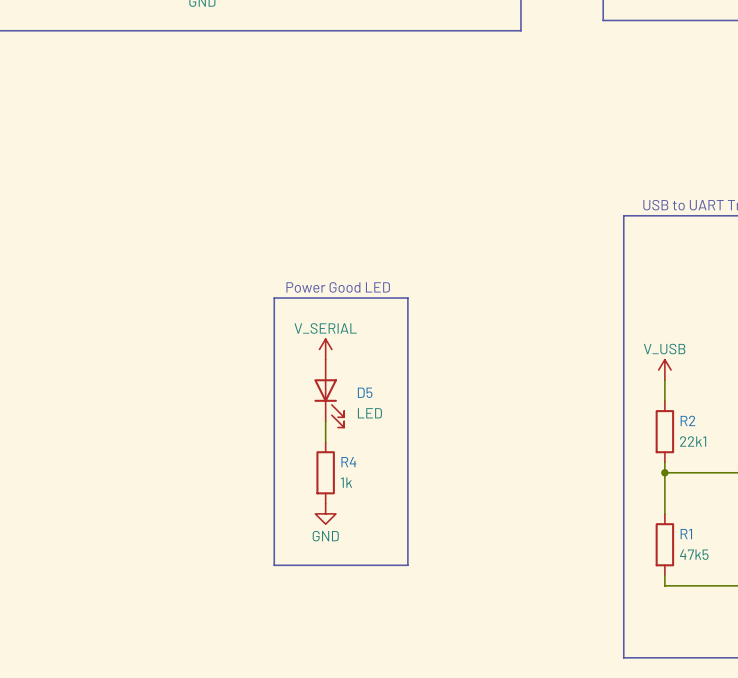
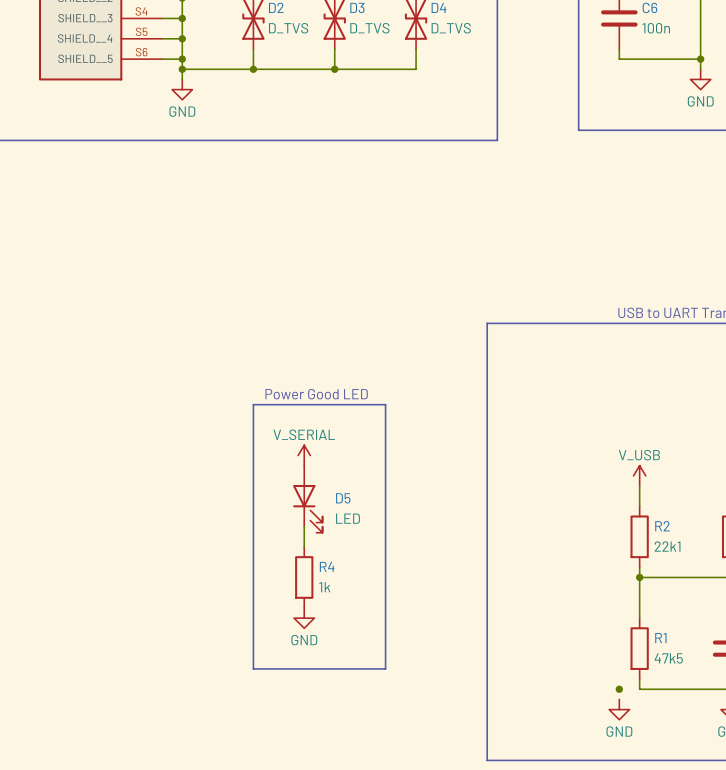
line: (623, 215) (623, 657) -> (598, 323) (487, 323) (487, 760) (598, 760)
junction: none -> (619, 689)
power symbol: none -> GND (619, 709)

